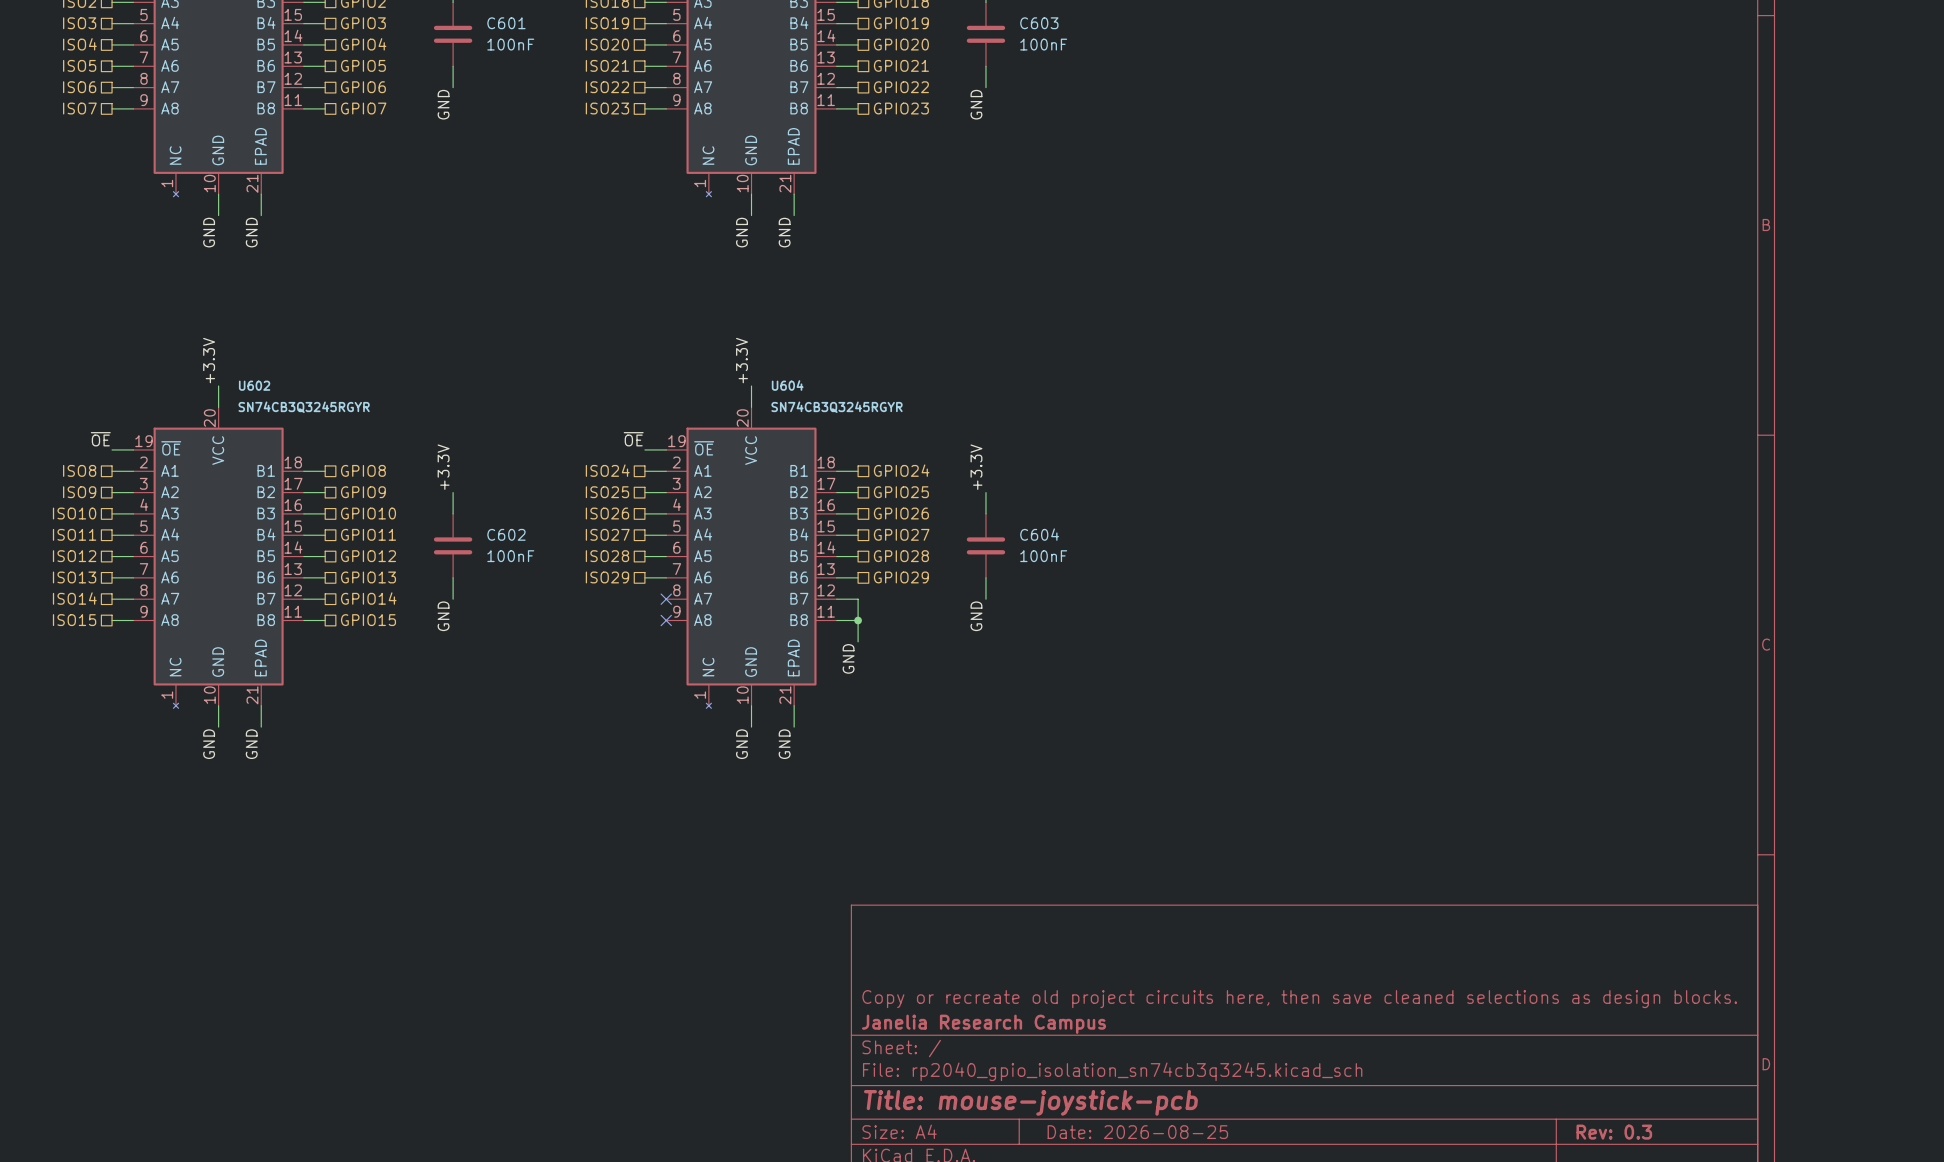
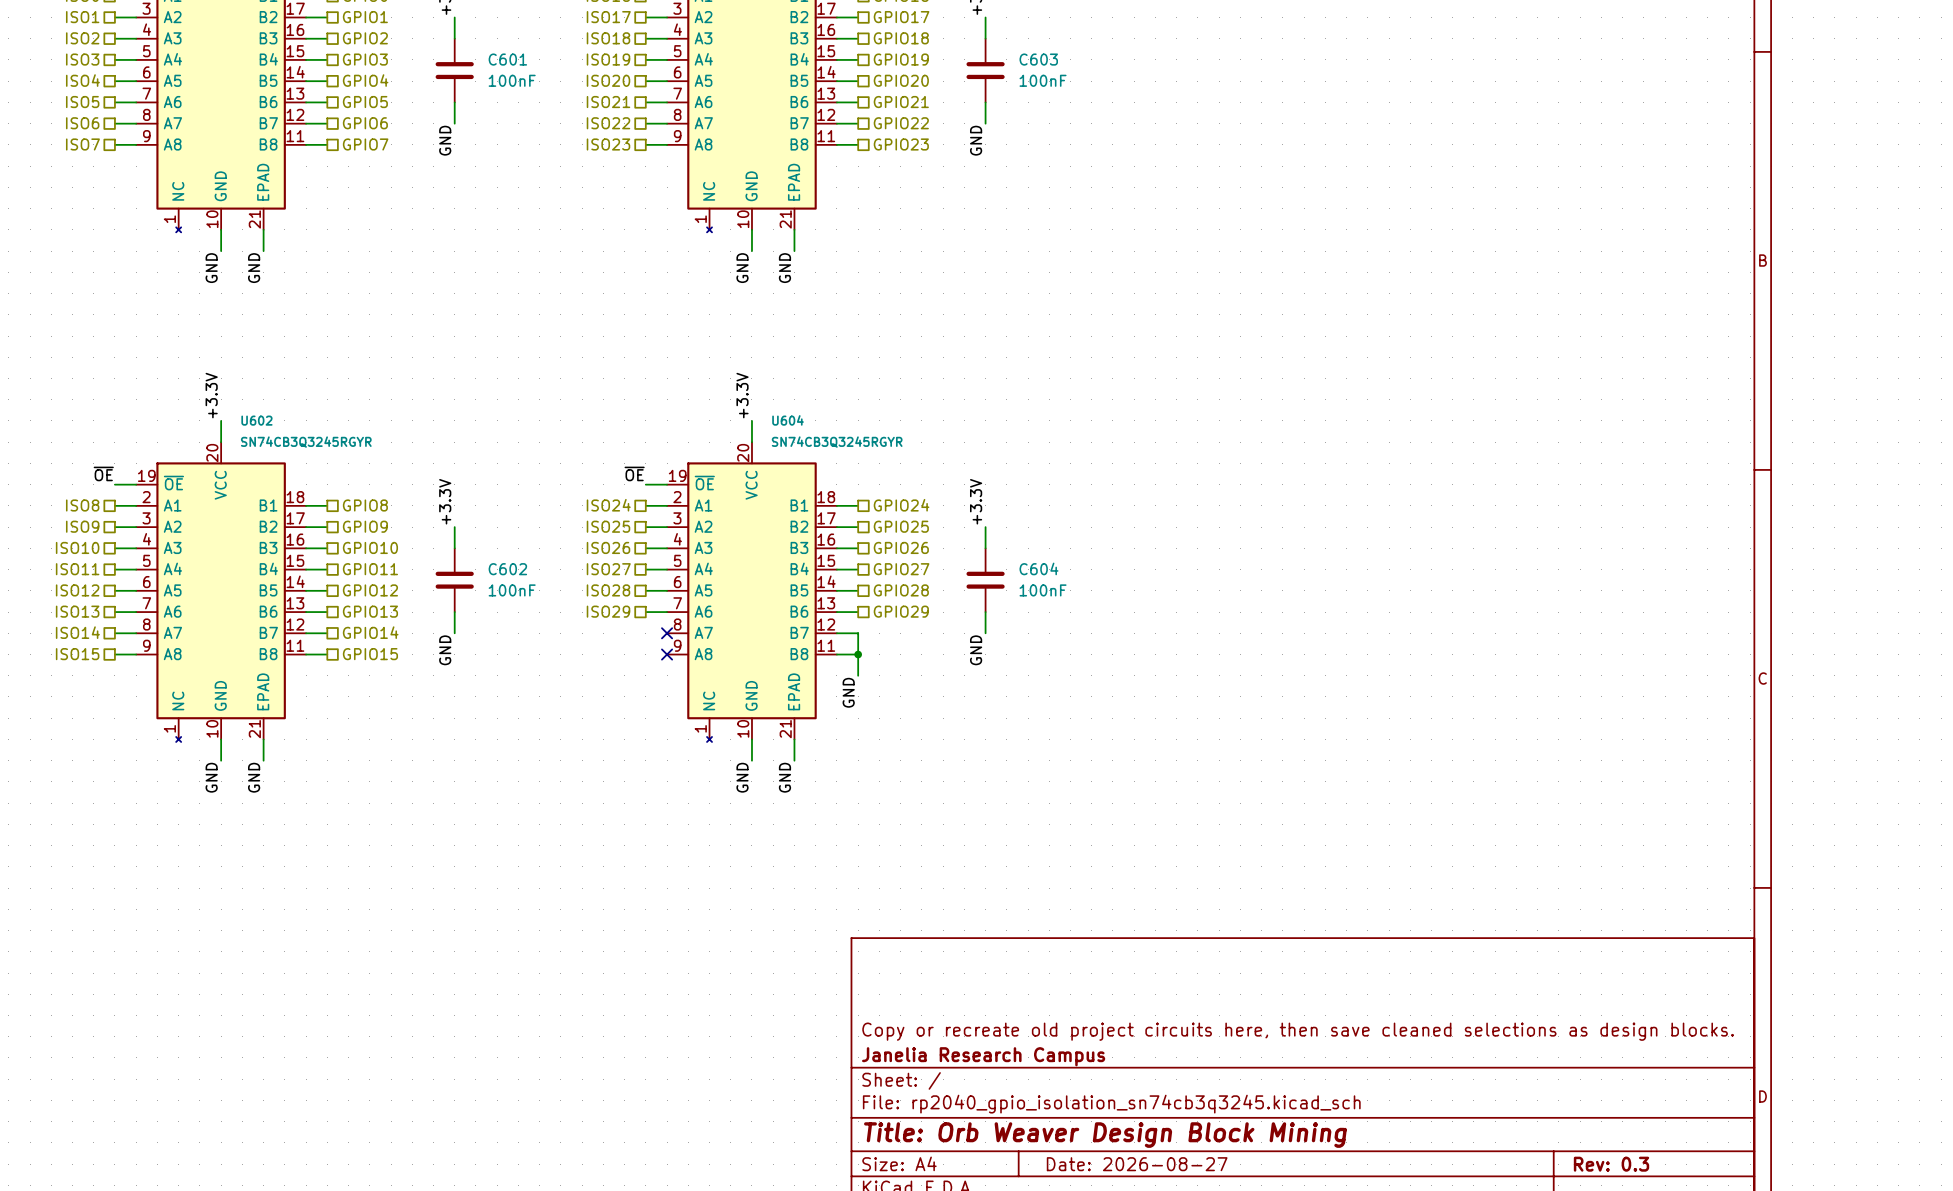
title block: Title: mouse-joystick-pcb (1030, 1102) -> Title: Orb Weaver Design Block Mining (1105, 1135)
title block: Date: 2026-08-25 (1137, 1132) -> Date: 2026-08-27 (1137, 1164)

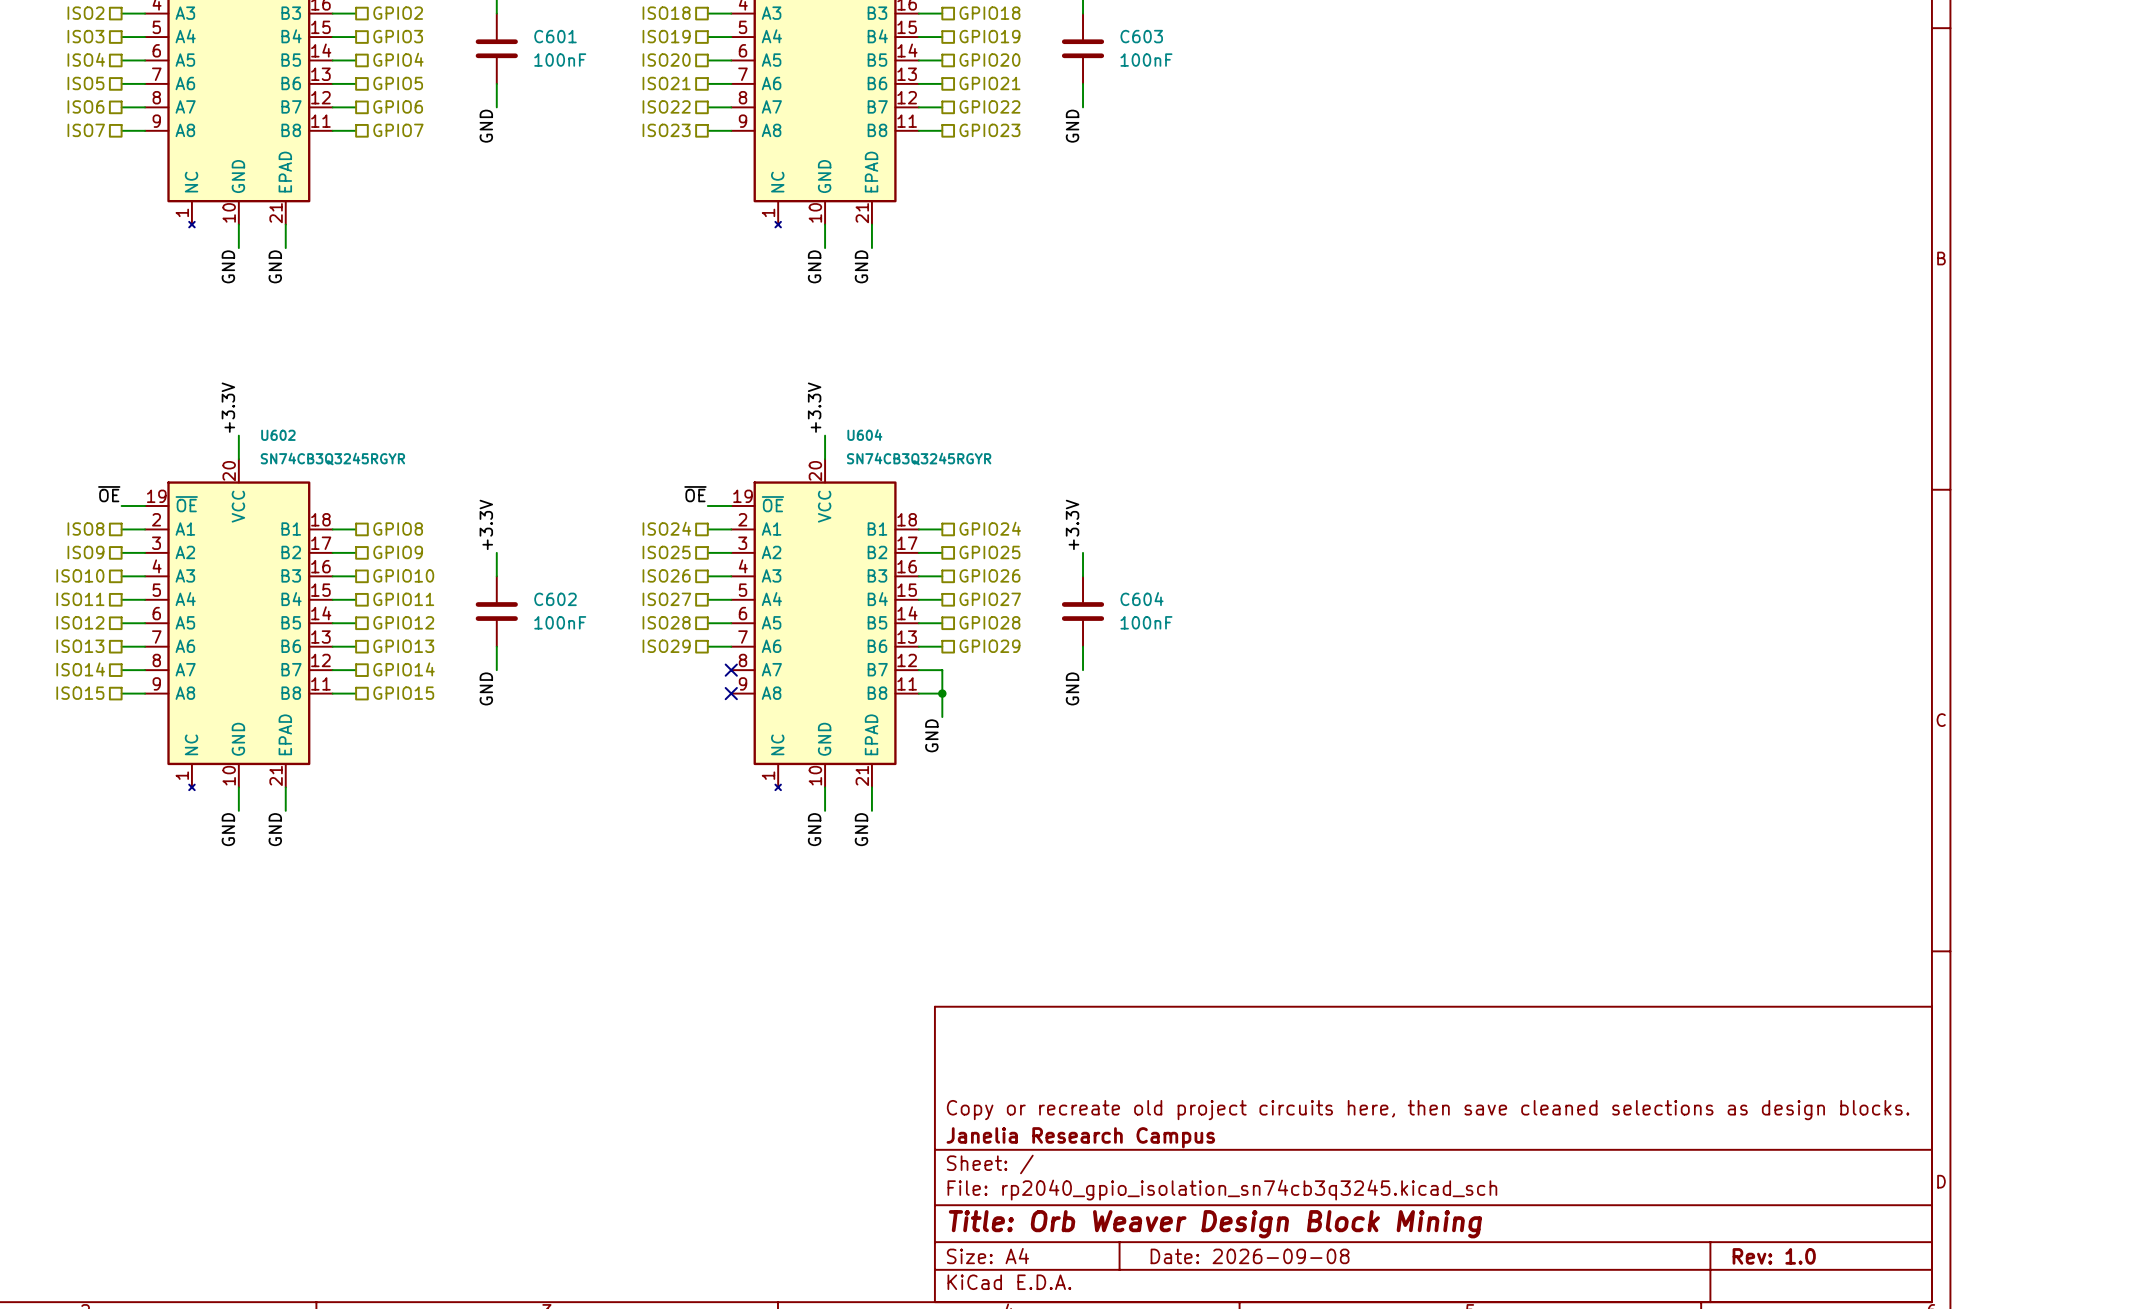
title block: Date: 2026-08-27 (1137, 1164) -> Date: 2026-09-08 (1250, 1256)
title block: Rev: 0.3 (1611, 1164) -> Rev: 1.0 (1774, 1256)

